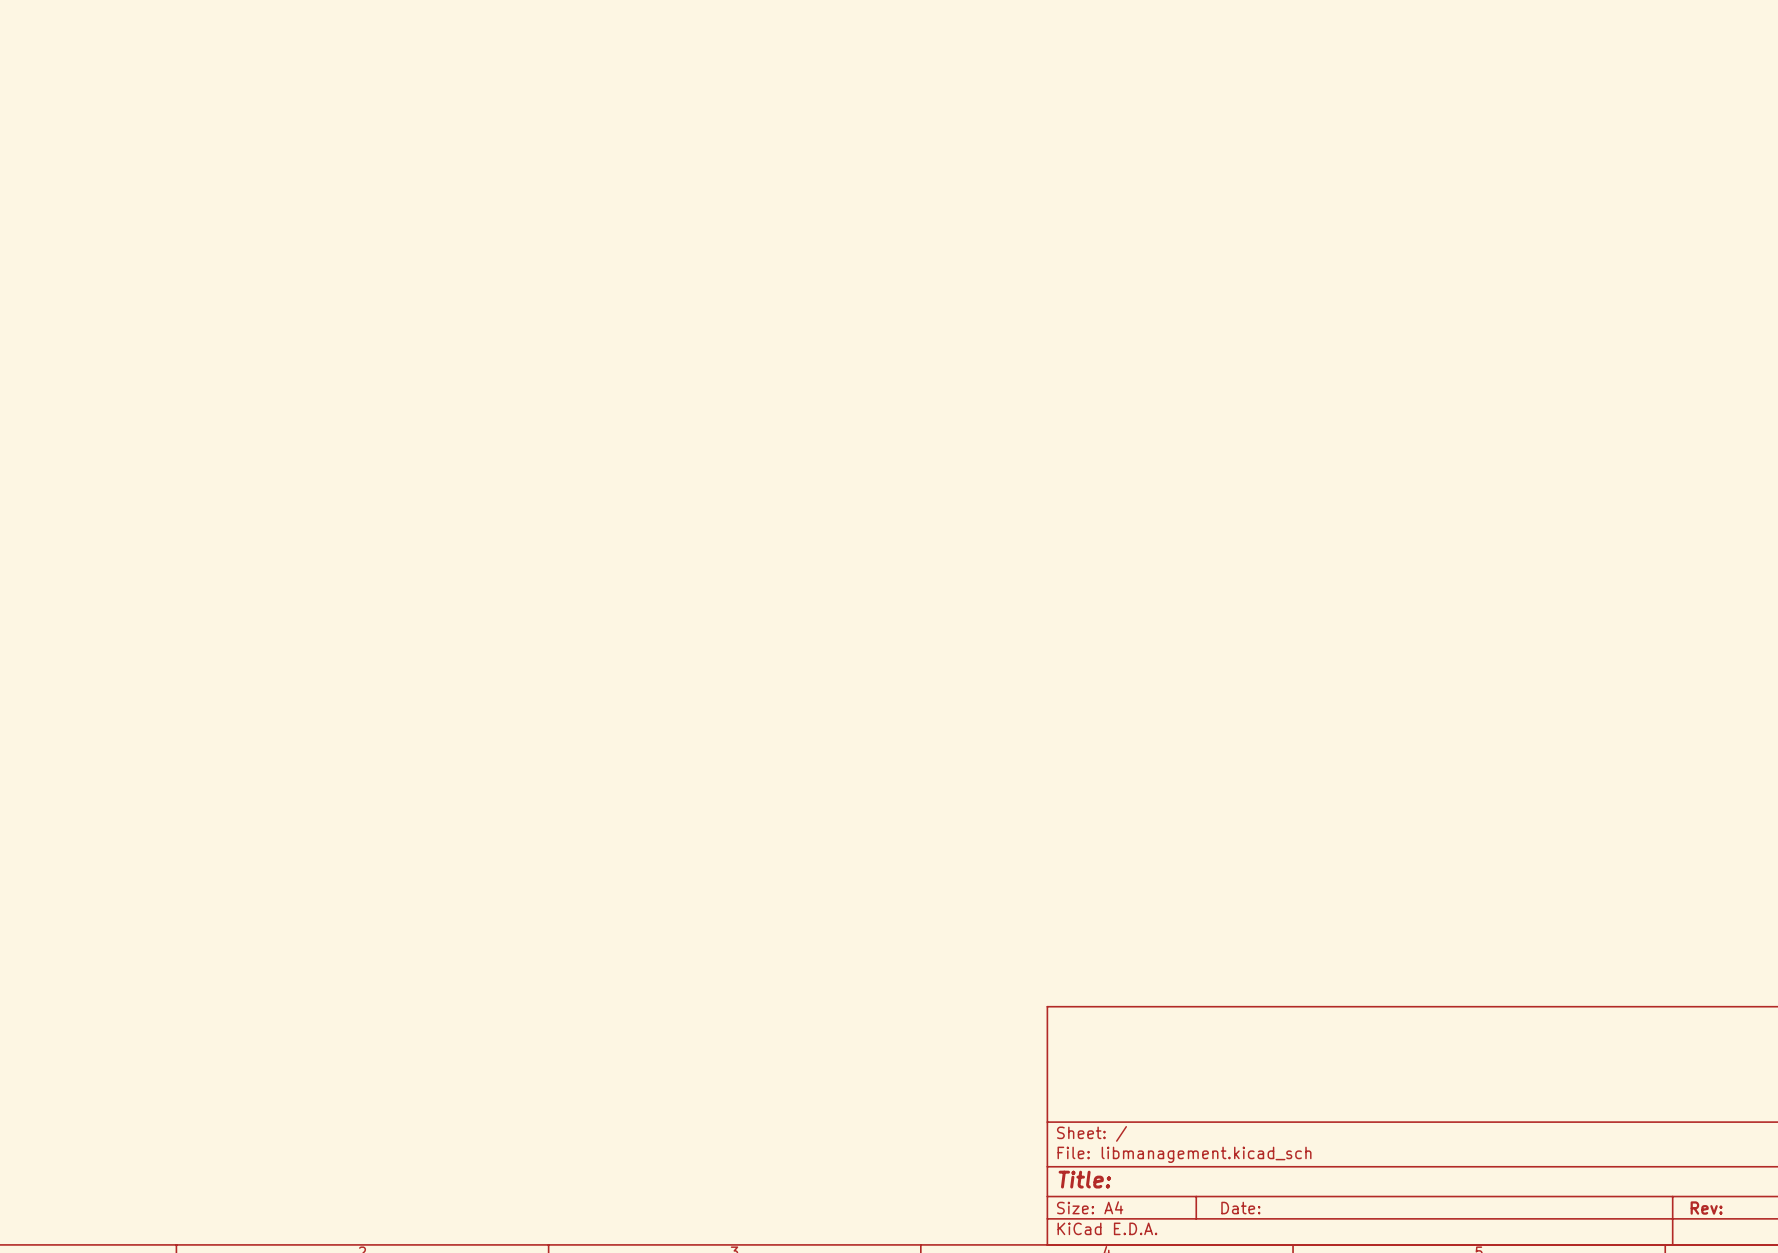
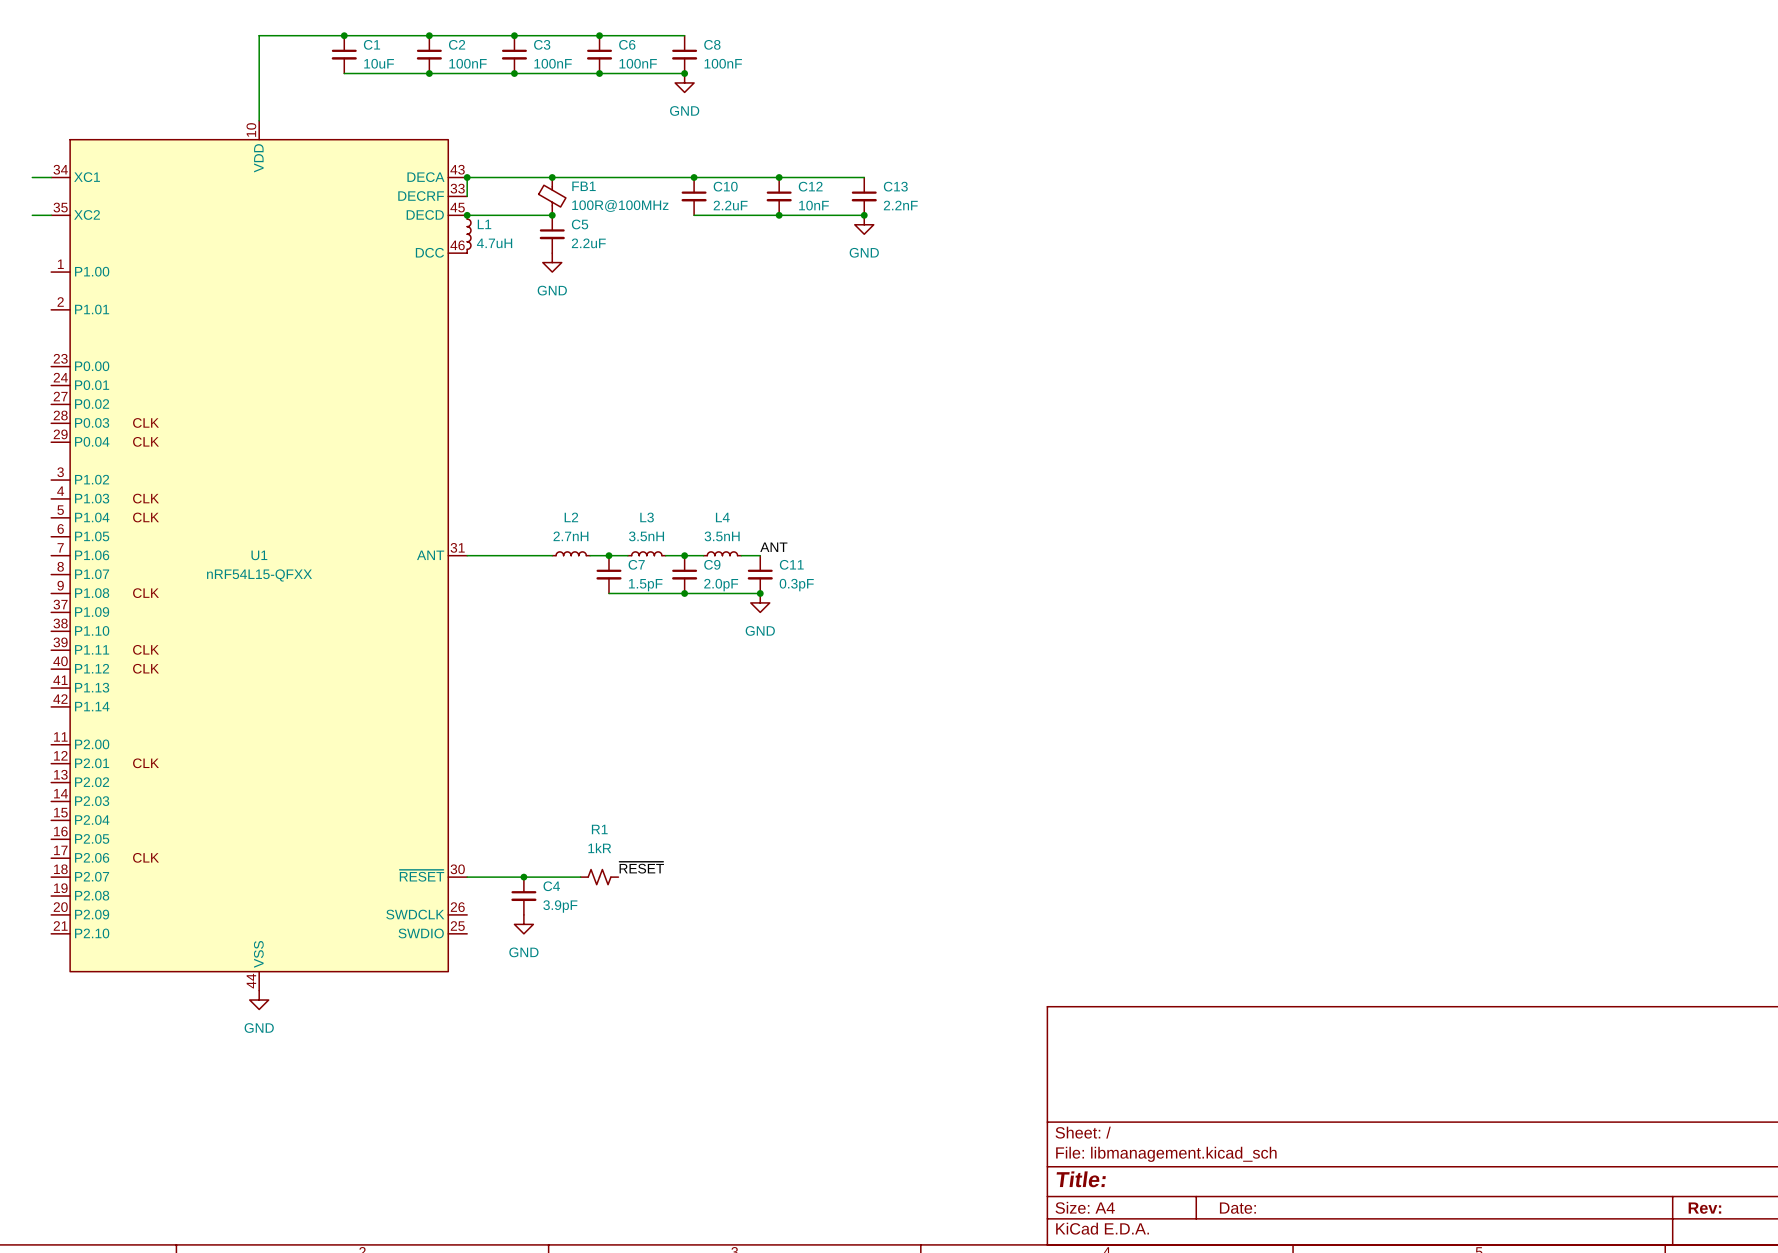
junction: none -> (344, 35)
junction: none -> (429, 35)
junction: none -> (514, 35)
junction: none -> (599, 35)
wire: none -> (684, 35) (259, 35) (259, 120)
C1: none -> 10uF (344, 54)
C2: none -> 100nF (429, 54)
C3: none -> 100nF (514, 54)
C6: none -> 100nF (599, 54)
C8: none -> 100nF (684, 54)
wire: none -> (344, 73) (684, 73)
junction: none -> (429, 73)
junction: none -> (514, 73)
junction: none -> (599, 73)
junction: none -> (684, 73)
power symbol: none -> GND (684, 82)
wire: none -> (32, 177) (51, 177)
junction: none -> (467, 177)
junction: none -> (552, 177)
junction: none -> (694, 177)
junction: none -> (779, 177)
wire: none -> (864, 177) (467, 177) (467, 196)
FB1: none -> 100R@100MHz (552, 196)
C10: none -> 2.2uF (694, 196)
C12: none -> 10nF (779, 196)
C13: none -> 2.2nF (864, 196)
wire: none -> (32, 215) (51, 215)
wire: none -> (467, 215) (552, 215)
junction: none -> (467, 215)
junction: none -> (552, 215)
wire: none -> (694, 215) (864, 215)
junction: none -> (779, 215)
junction: none -> (864, 215)
power symbol: none -> GND (864, 224)
L1: none -> 4.7uH (469, 234)
C5: none -> 2.2uF (552, 234)
power symbol: none -> GND (552, 262)
label: none -> ANT (773, 547)
L2: none -> 2.7nH (571, 553)
L3: none -> 3.5nH (646, 553)
L4: none -> 3.5nH (722, 553)
U1: none -> nRF54L15-QFXX (259, 555)
wire: none -> (467, 555) (552, 555)
wire: none -> (590, 555) (627, 555)
junction: none -> (608, 555)
wire: none -> (665, 555) (703, 555)
junction: none -> (684, 555)
wire: none -> (741, 555) (760, 555)
C7: none -> 1.5pF (608, 574)
C9: none -> 2.0pF (684, 574)
C11: none -> 0.3pF (760, 574)
wire: none -> (608, 593) (760, 593)
junction: none -> (684, 593)
junction: none -> (760, 593)
power symbol: none -> GND (760, 602)
label: none -> ~{RESET} (641, 867)
wire: none -> (467, 877) (580, 877)
junction: none -> (523, 877)
R1: none -> 1kR (599, 877)
C4: none -> 3.9pF (523, 896)
power symbol: none -> GND (523, 924)
power symbol: none -> GND (259, 1000)

